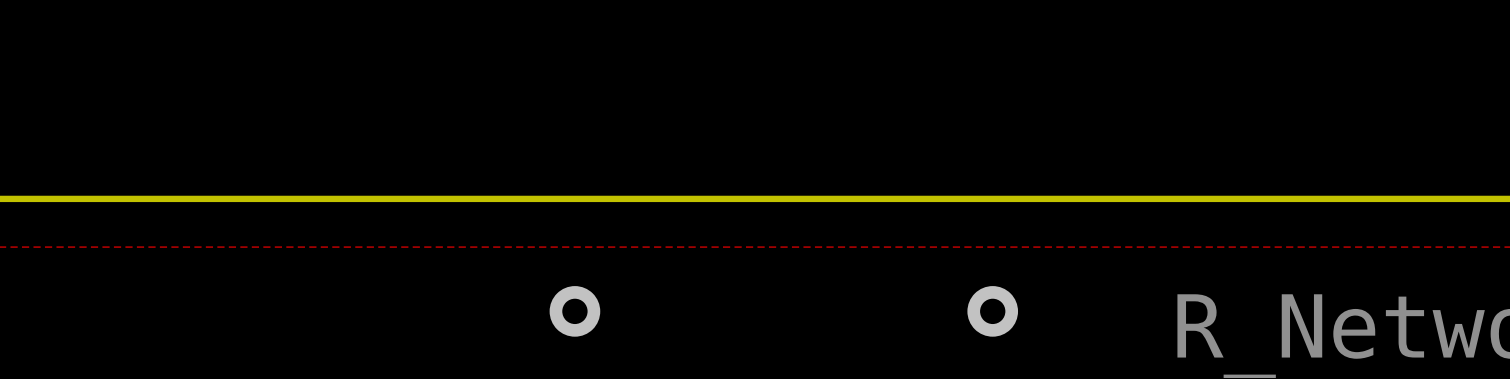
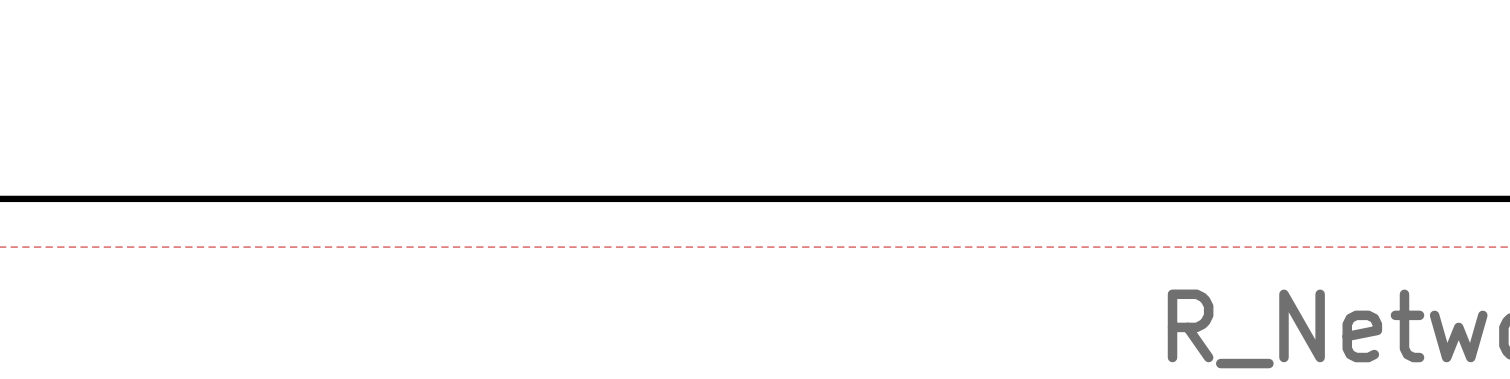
via: (574, 311) -> none
via: (992, 311) -> none

